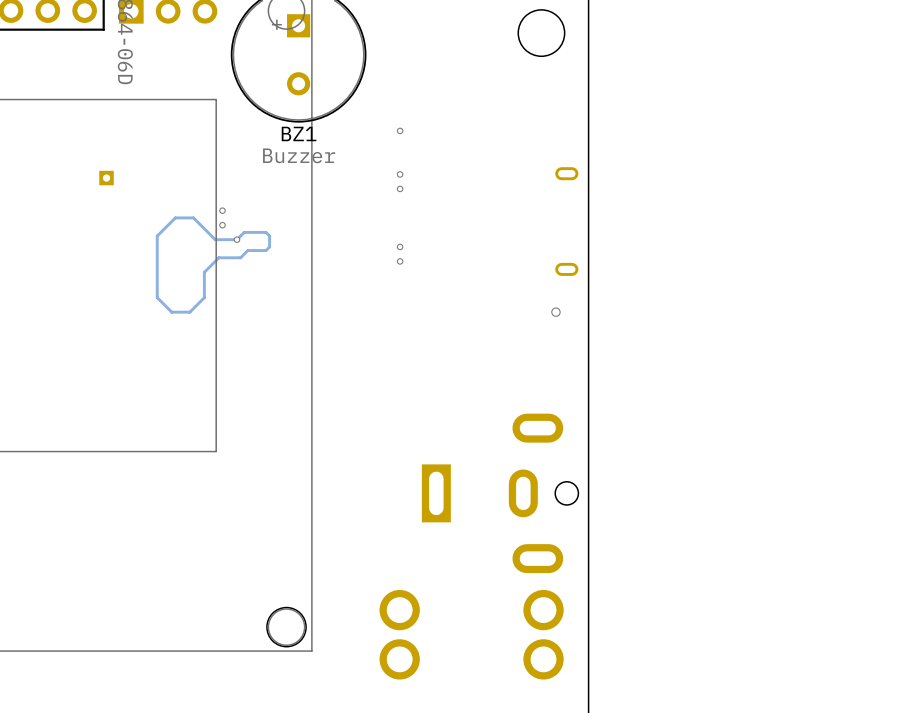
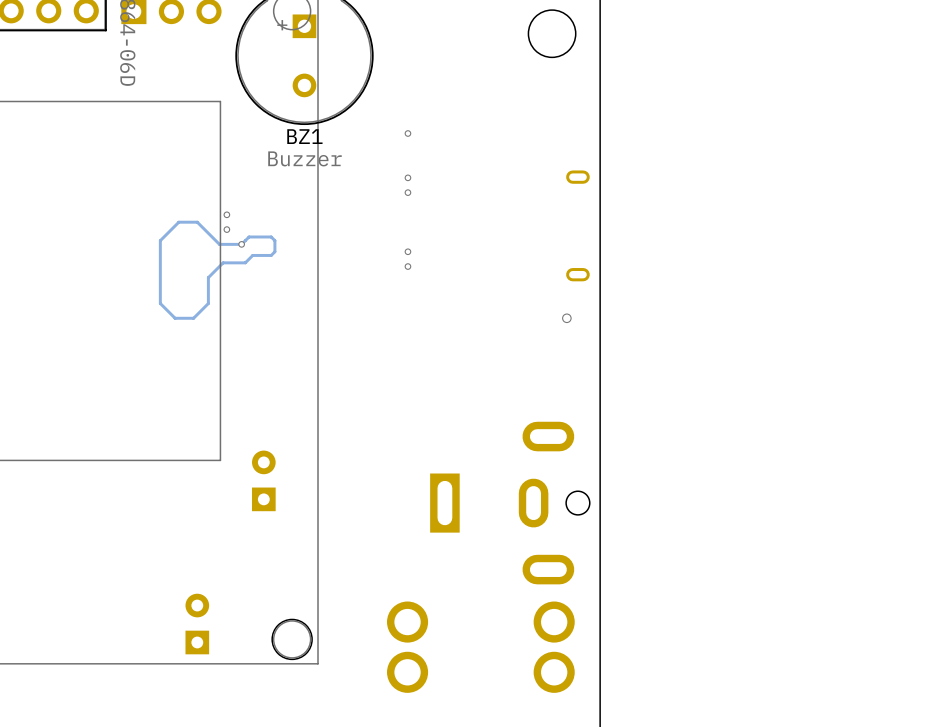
part: (106, 178) -> none
part: none -> (263, 480)
part: none -> (197, 624)

